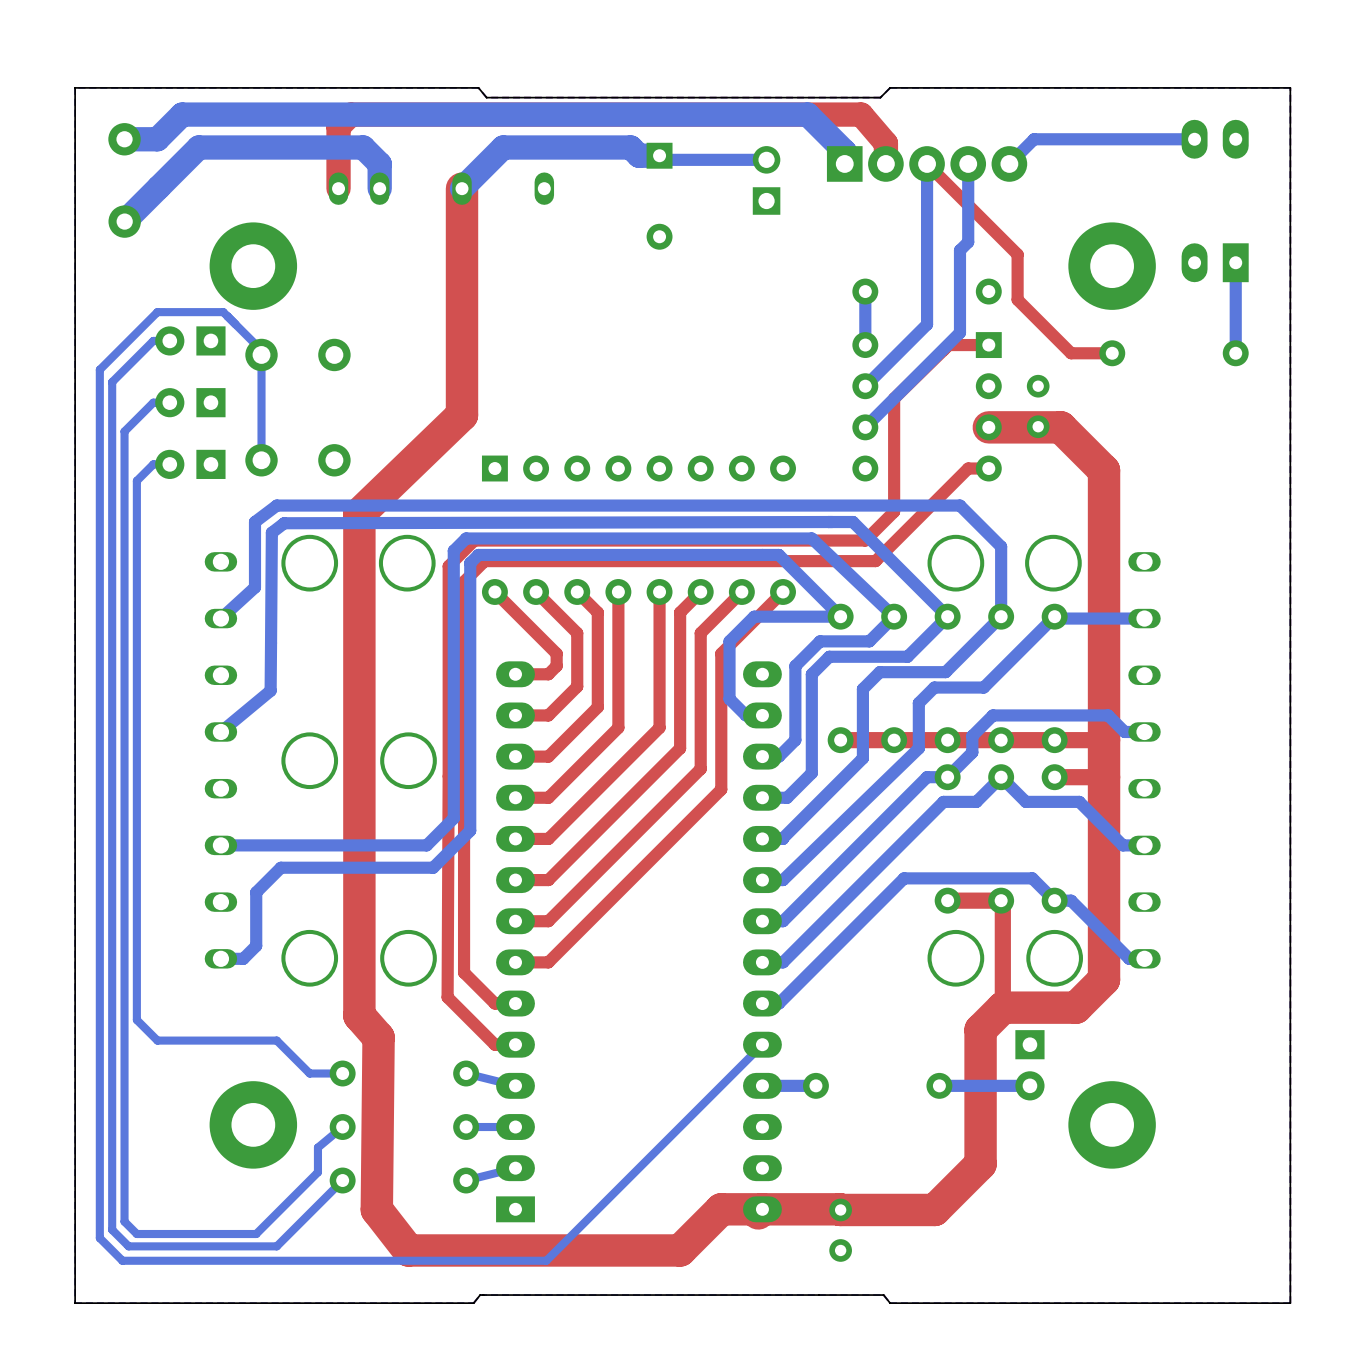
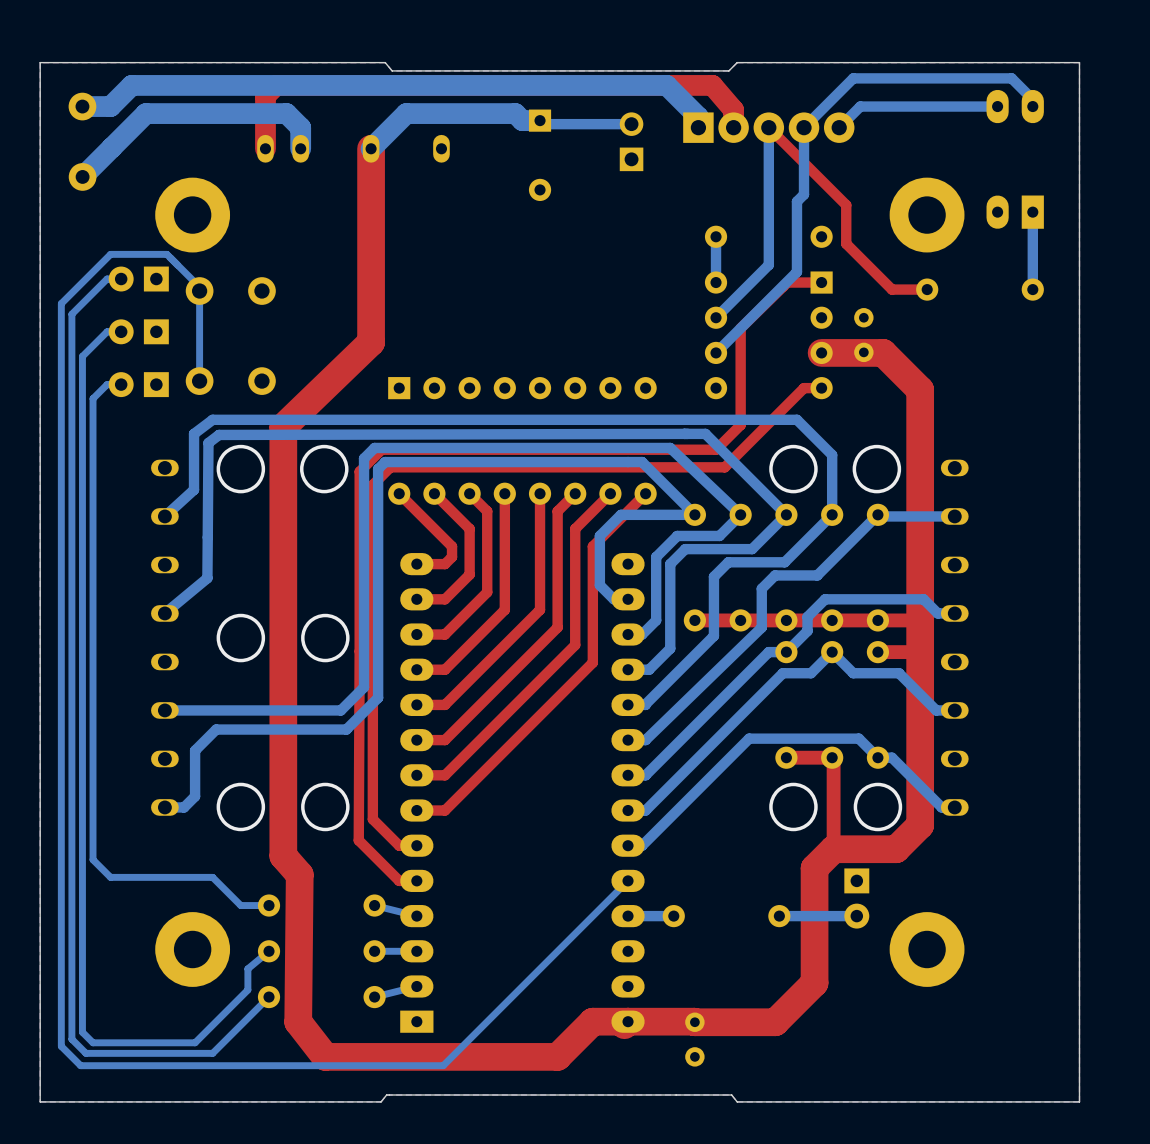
bottom track: none -> (1032, 106) (1032, 99) (1011, 78) (853, 78) (804, 127)

